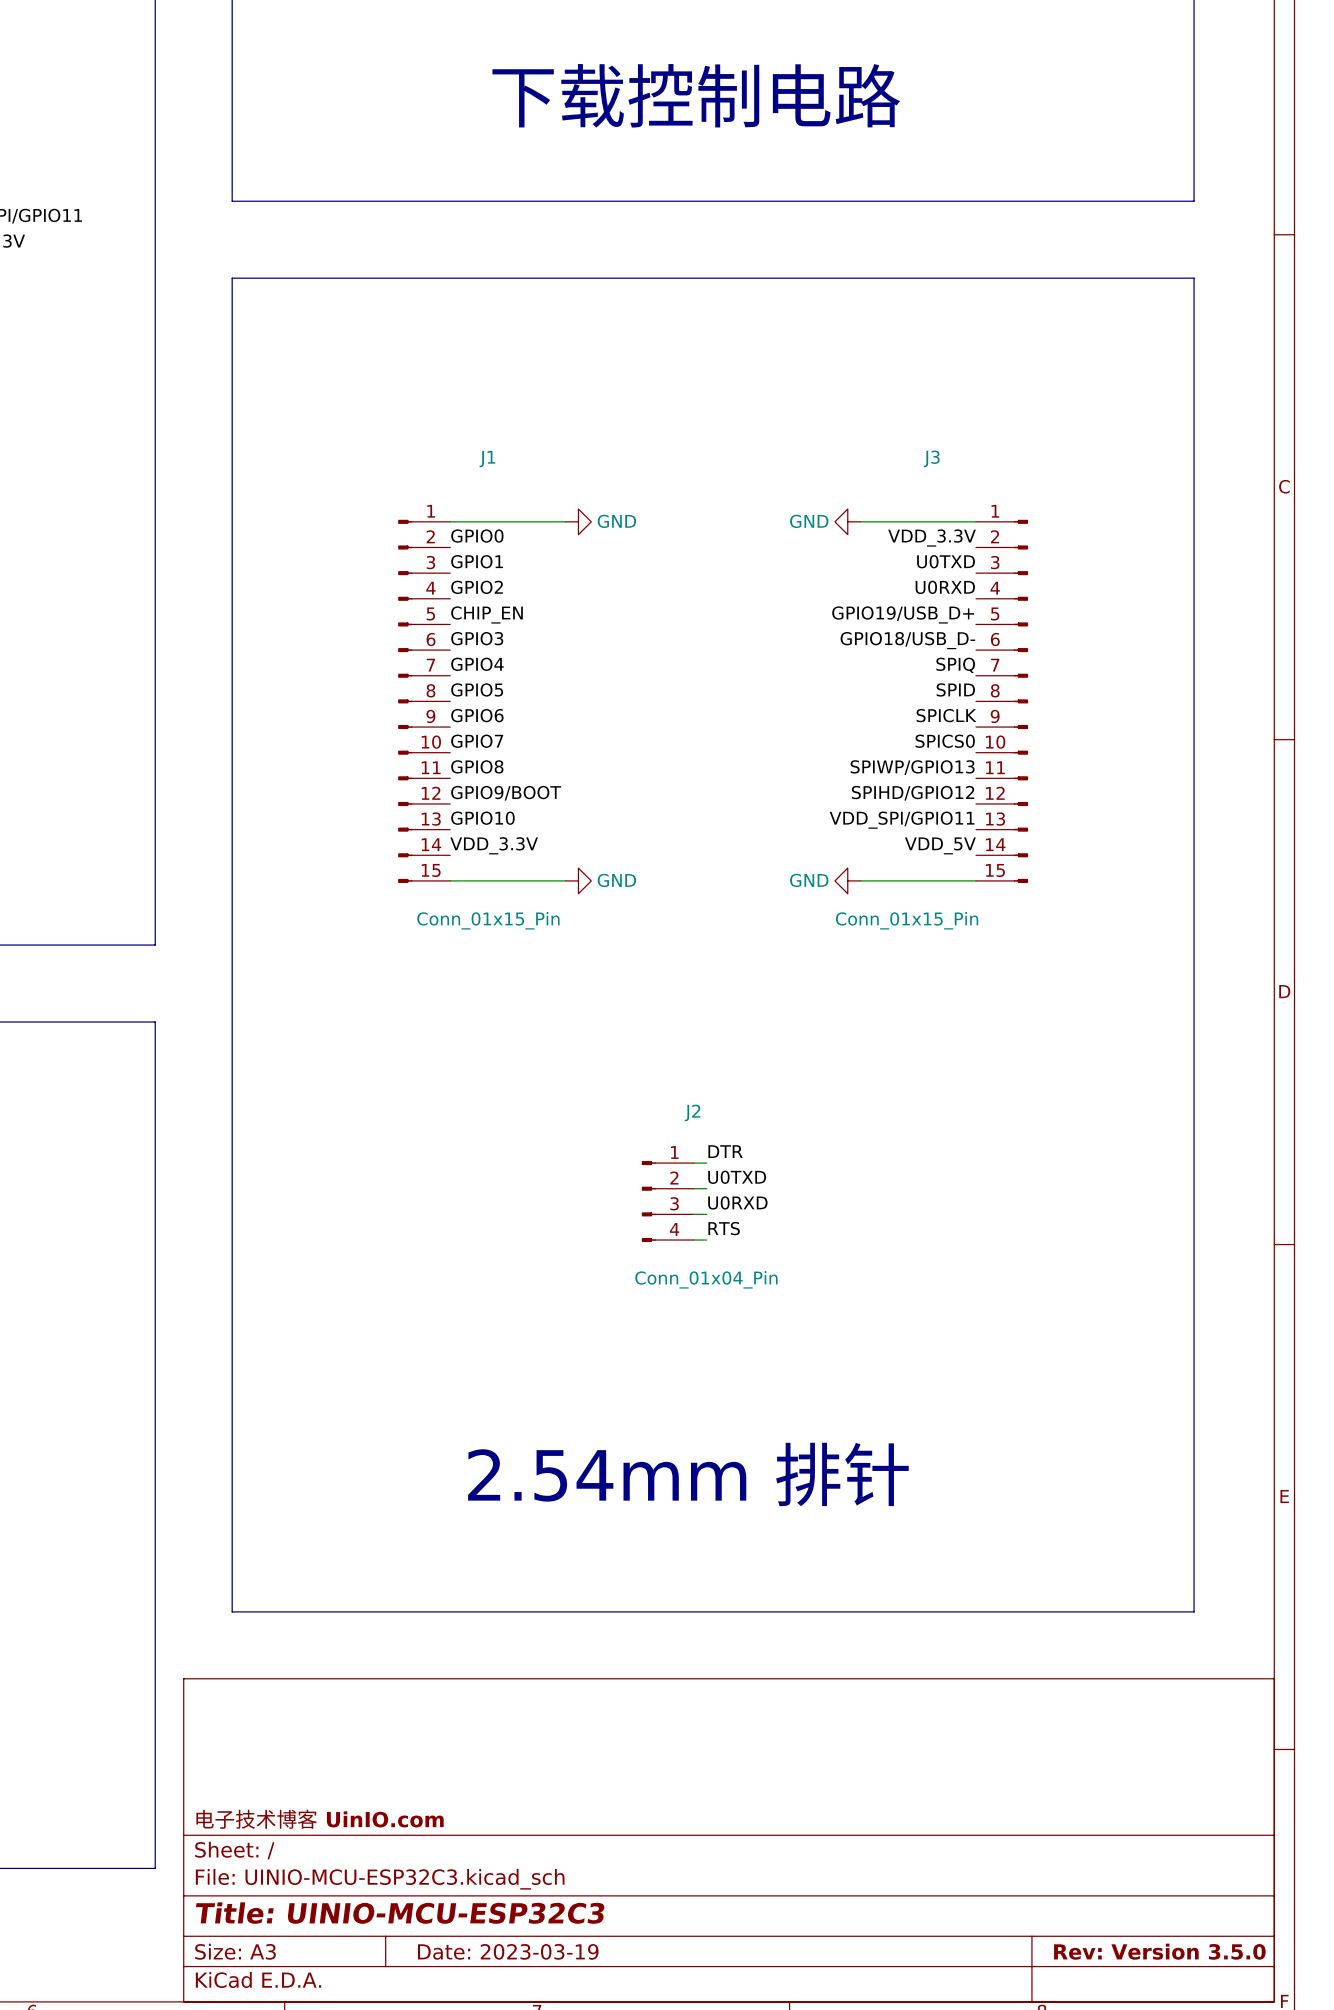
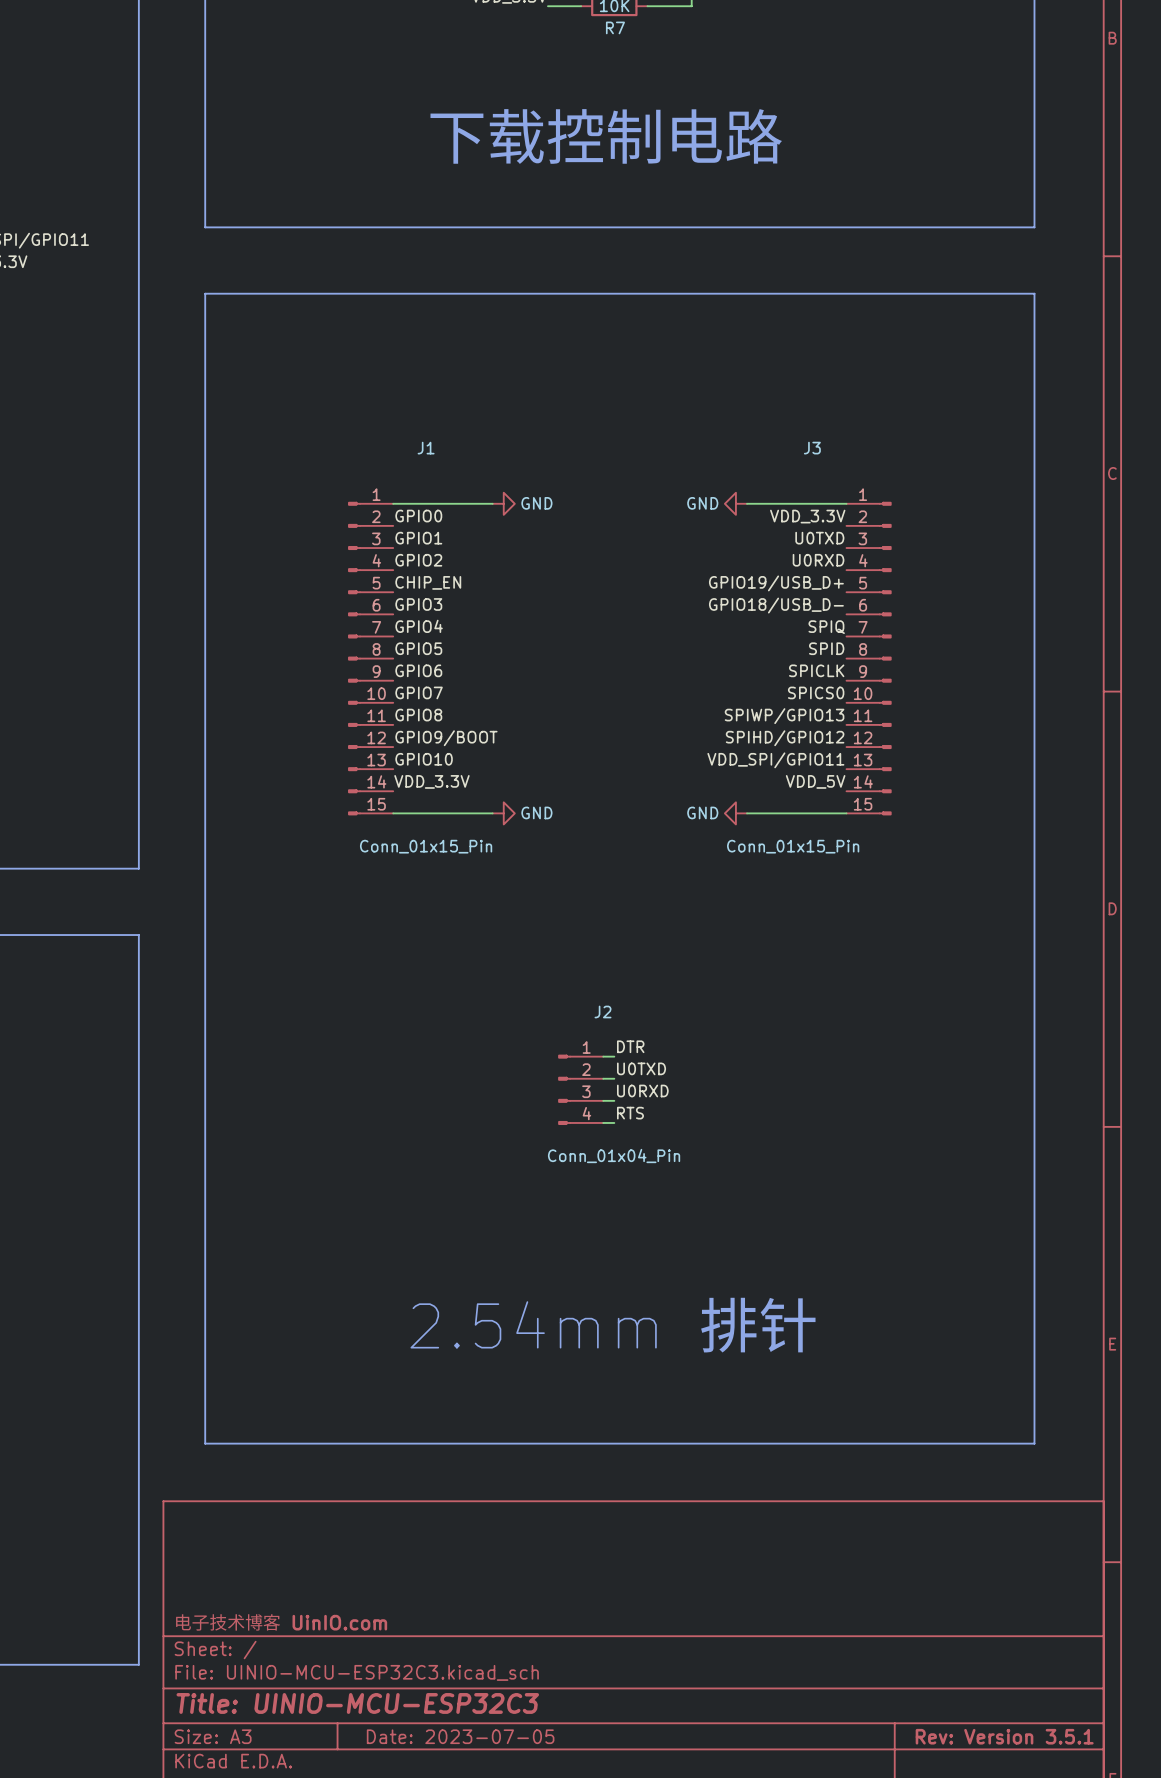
title block: Date: 2023-03-19 (508, 1951) -> Date: 2023-07-05 (460, 1736)
title block: Rev: Version 3.5.0 (1159, 1951) -> Rev: Version 3.5.1 (1004, 1736)

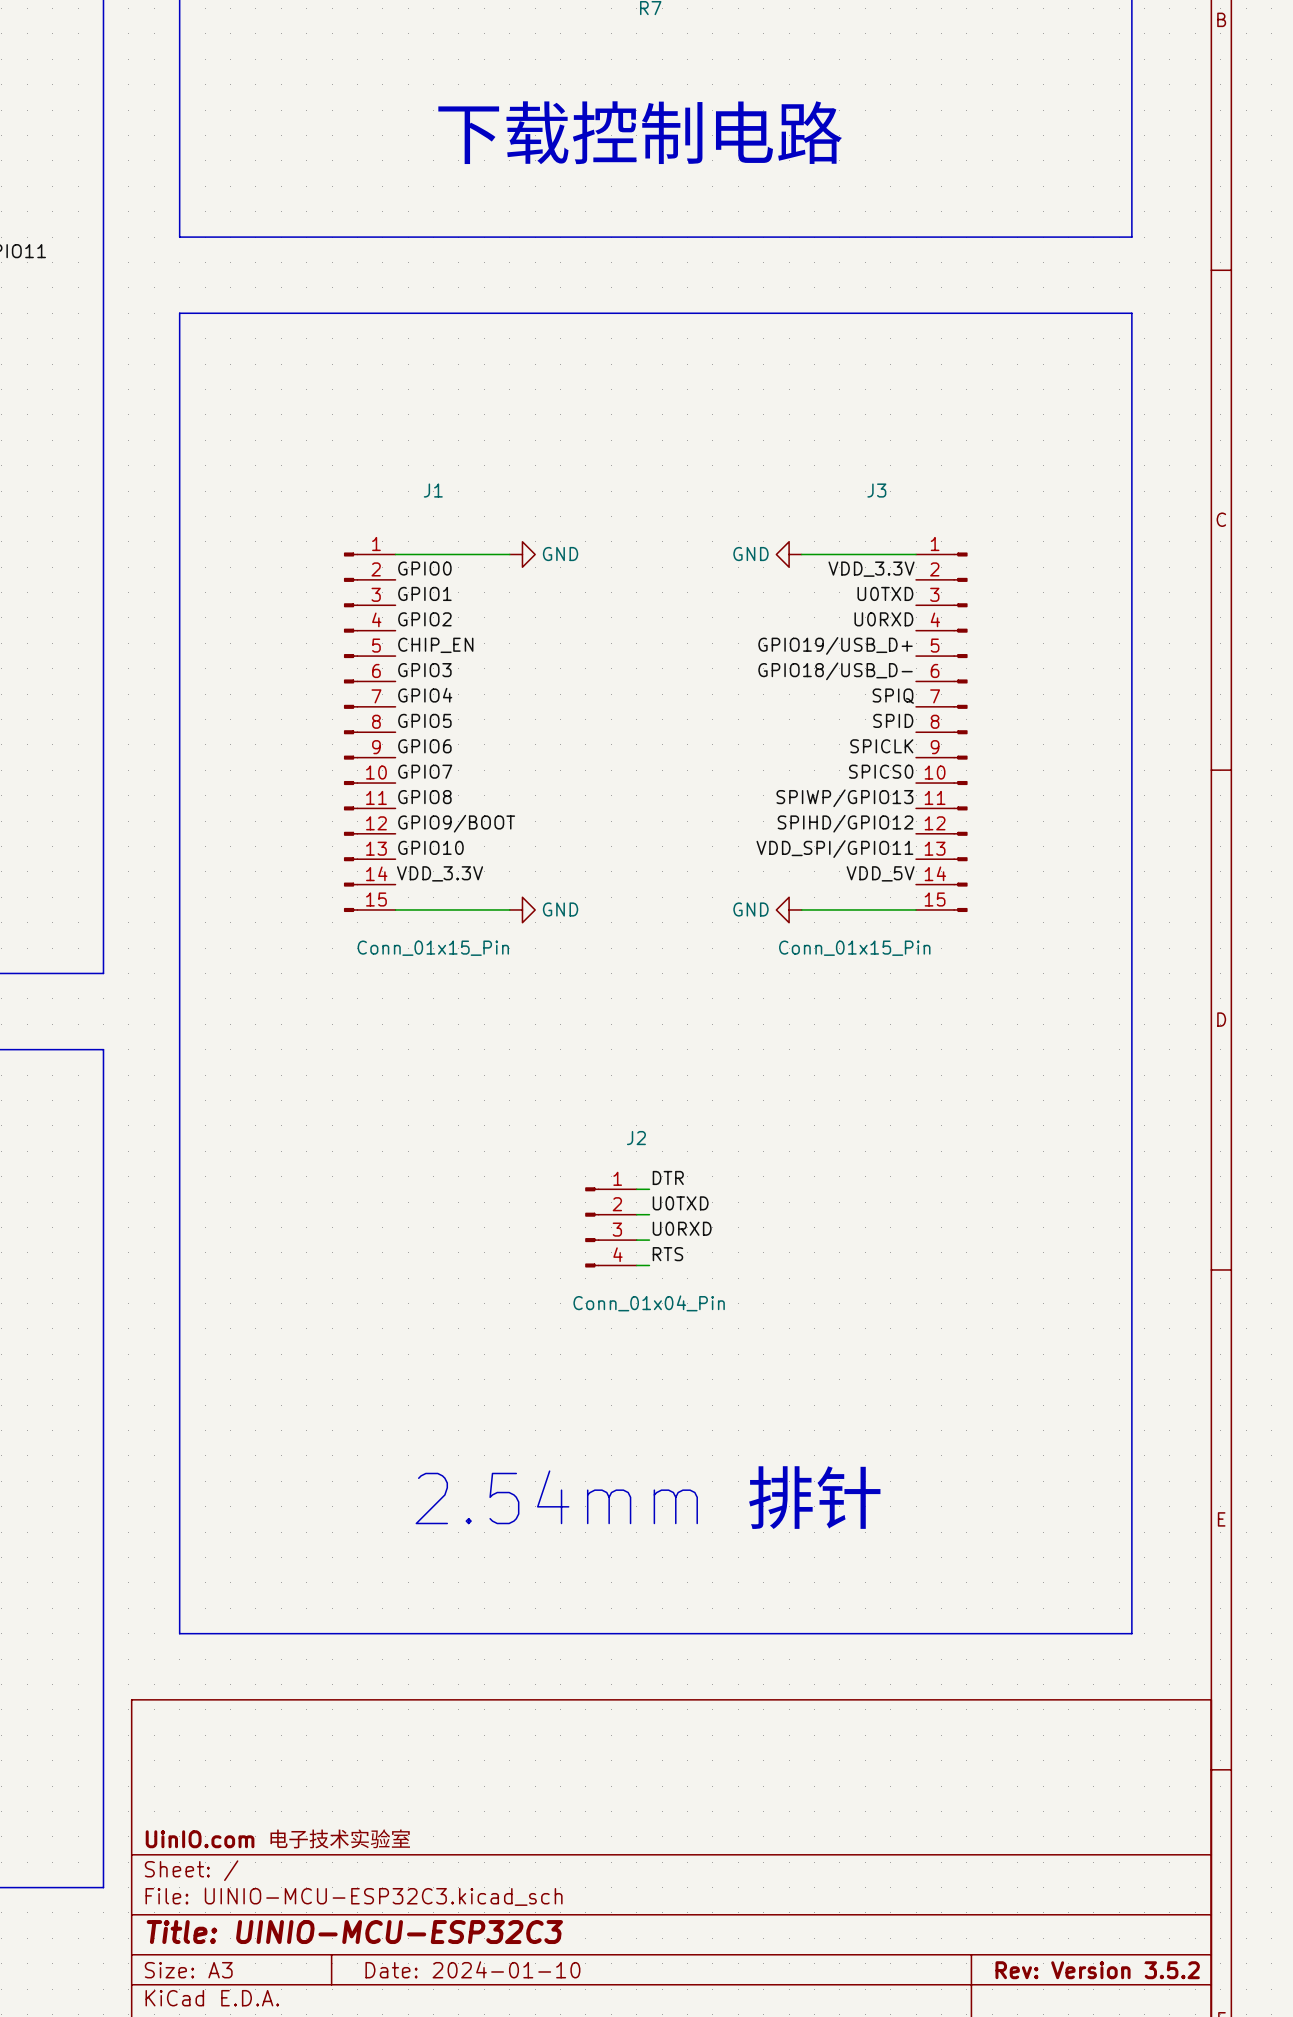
title block: 电子技术博客 UinIO.com (280, 1622) -> UinIO.com 电子技术实验室 (278, 1838)
title block: Date: 2023-07-05 (460, 1736) -> Date: 2024-01-10 (472, 1969)
title block: Rev: Version 3.5.1 (1004, 1736) -> Rev: Version 3.5.2 (1097, 1970)

